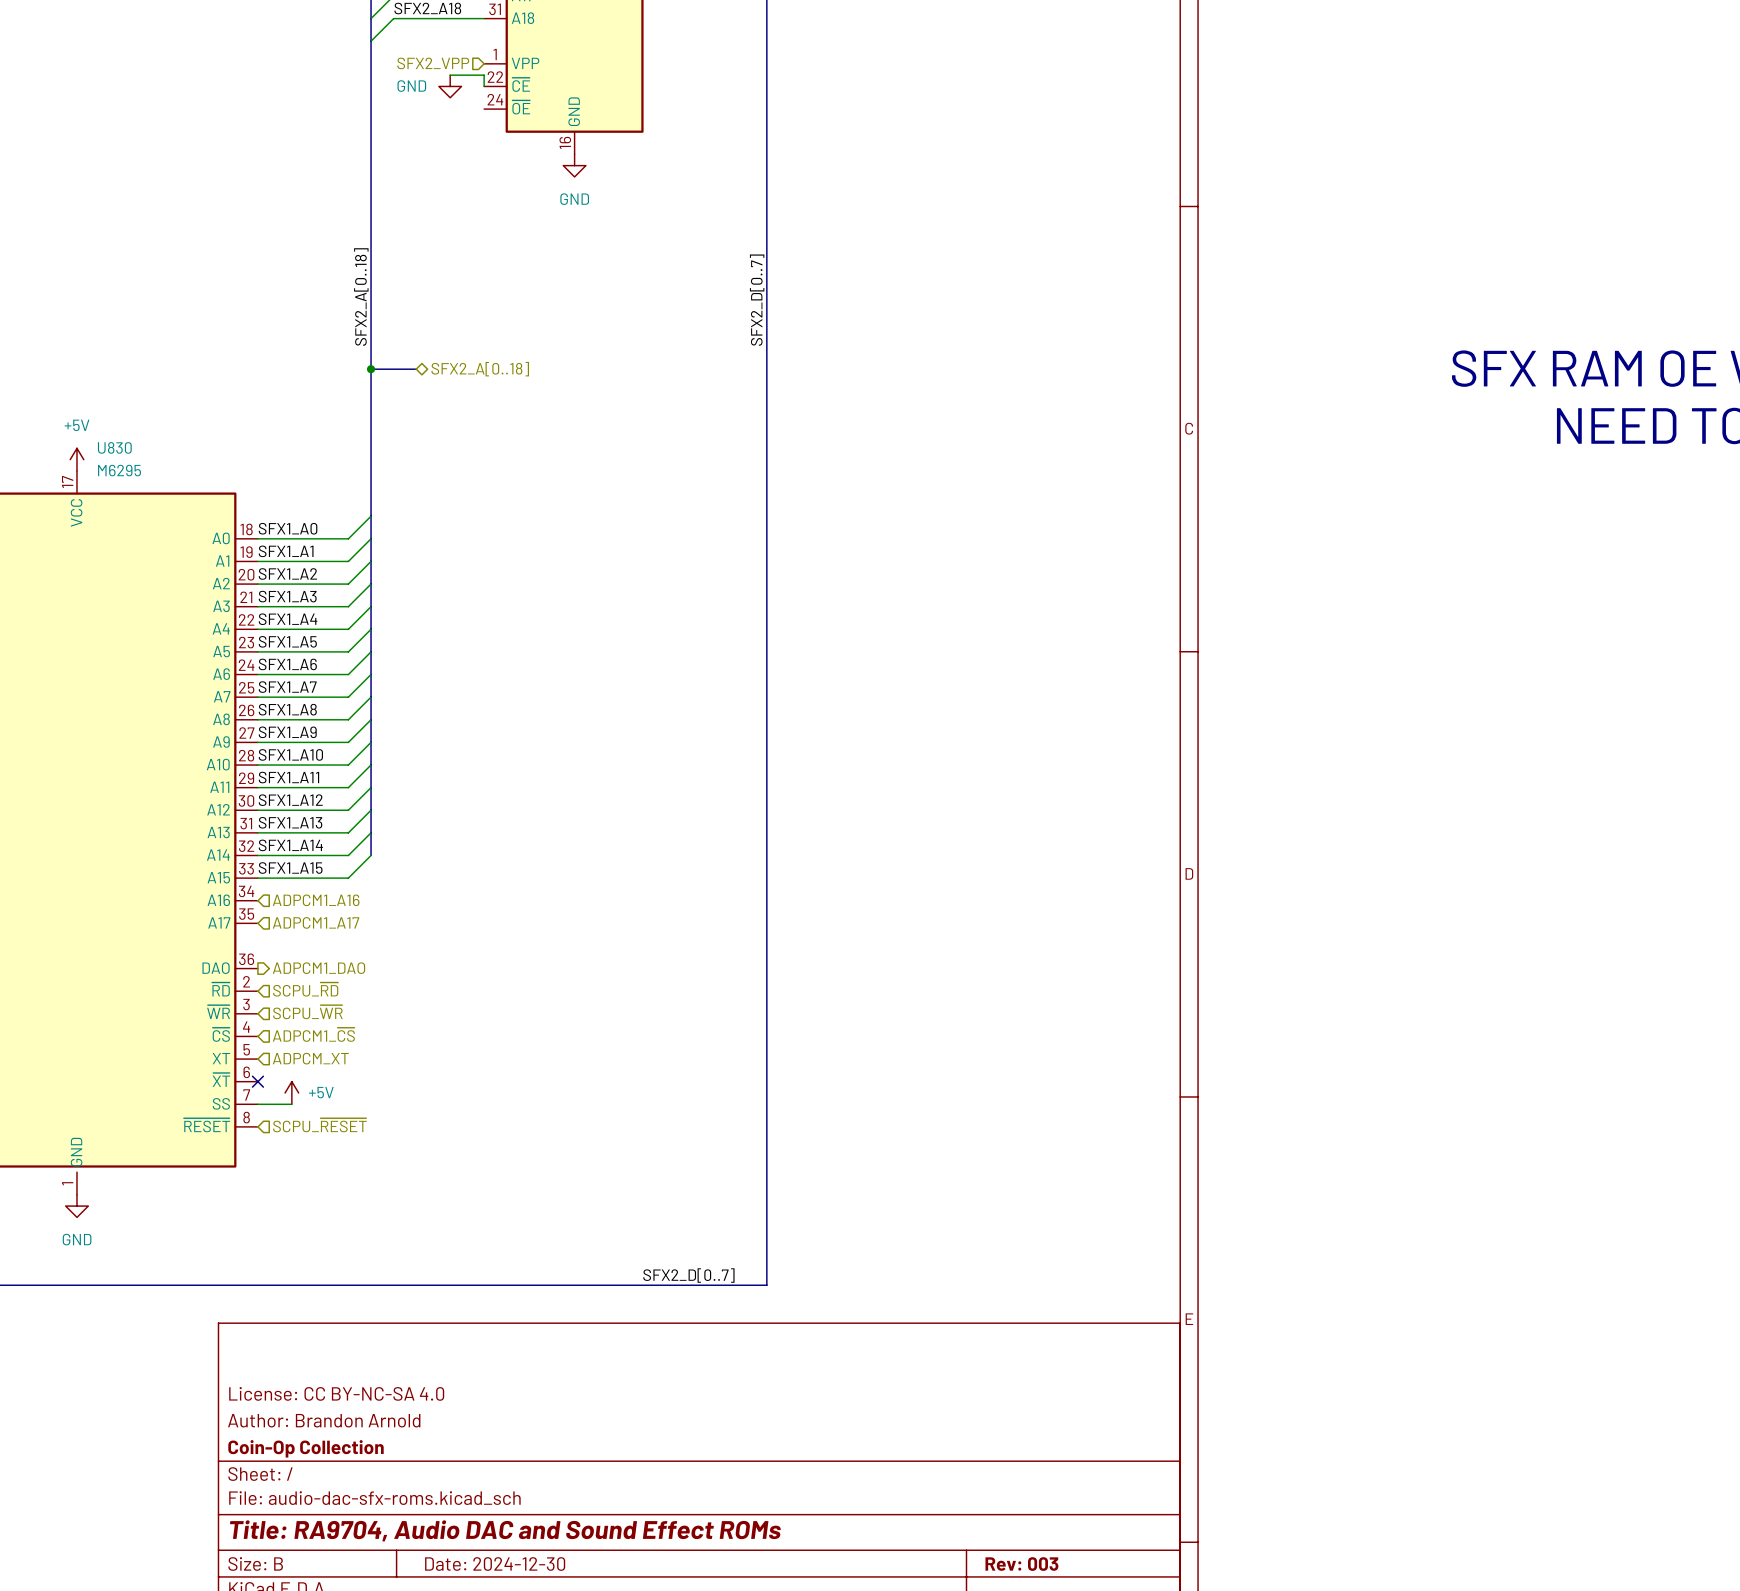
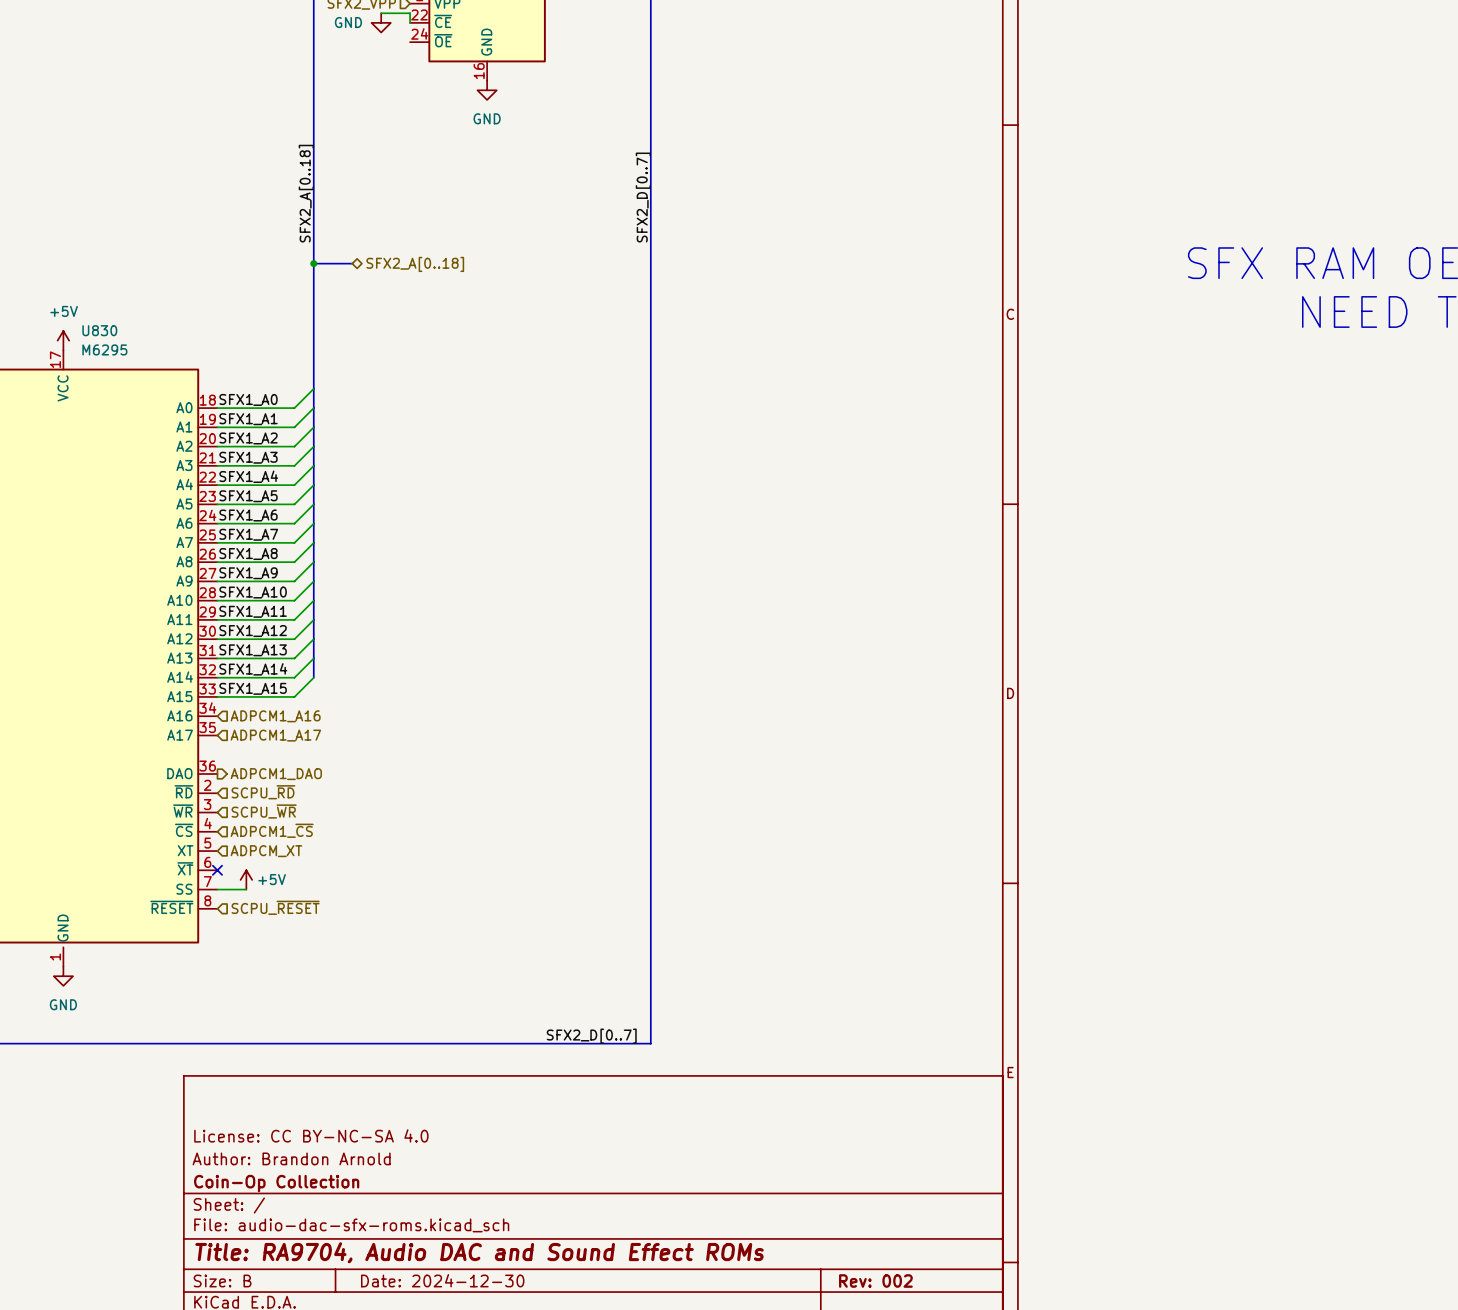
title block: Rev: 003 (1021, 1564) -> Rev: 002 (875, 1280)

